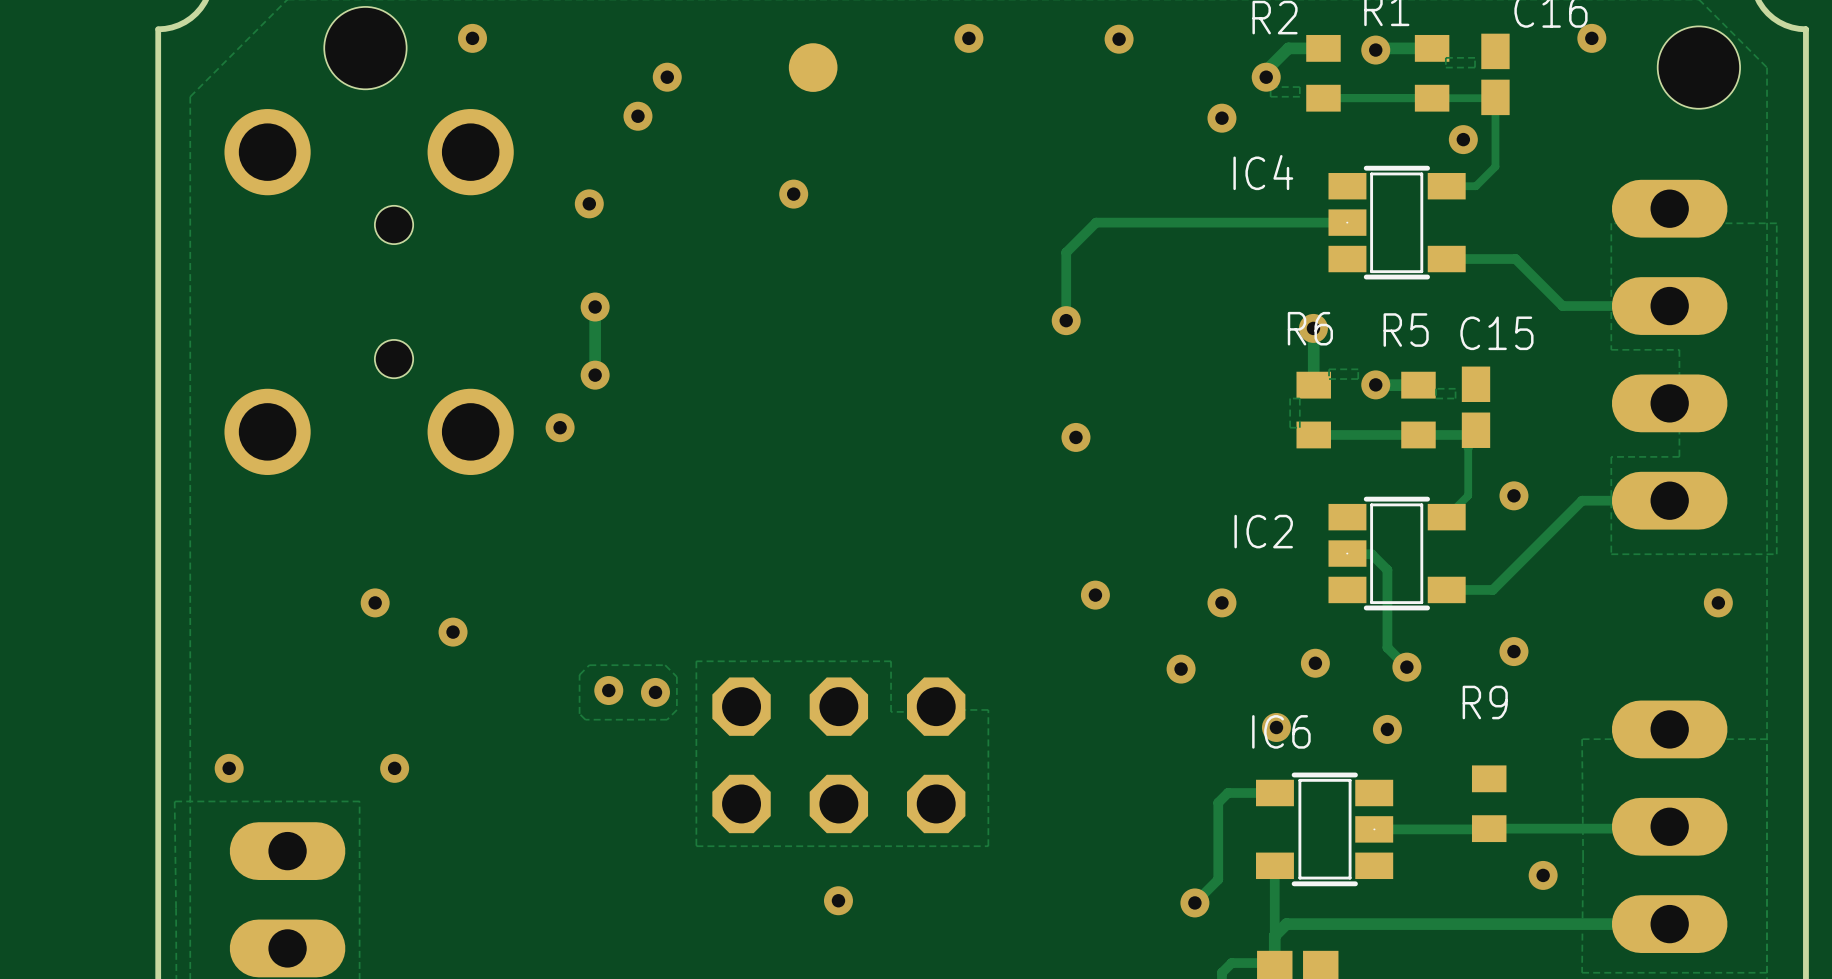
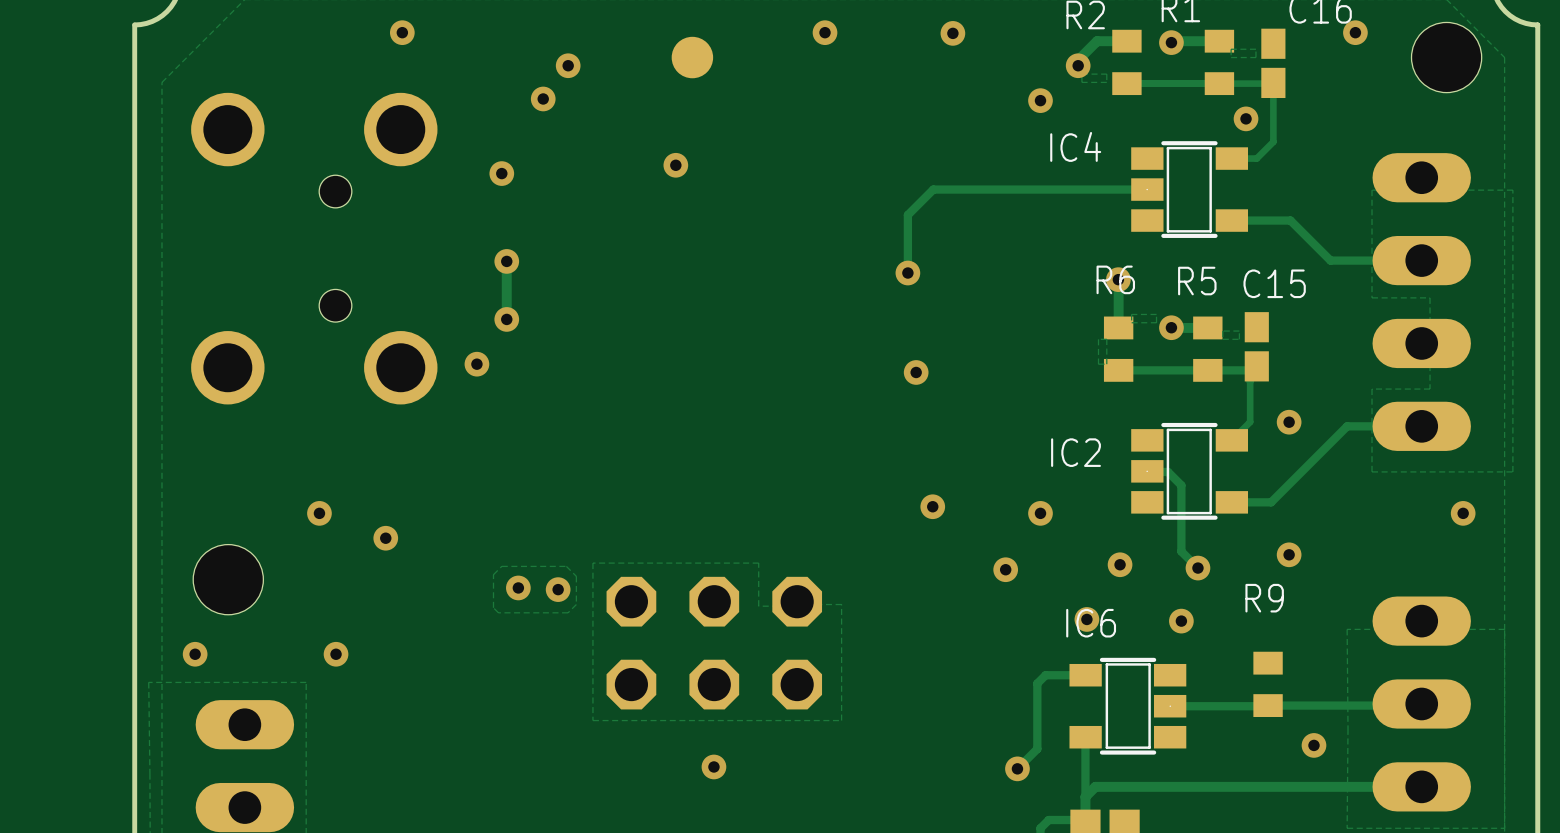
hole position: (365, 48) -> (228, 579)

